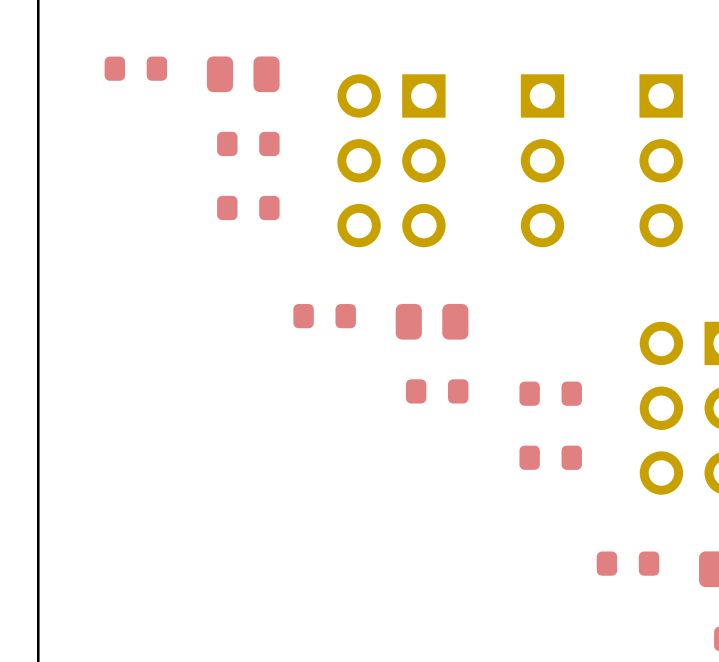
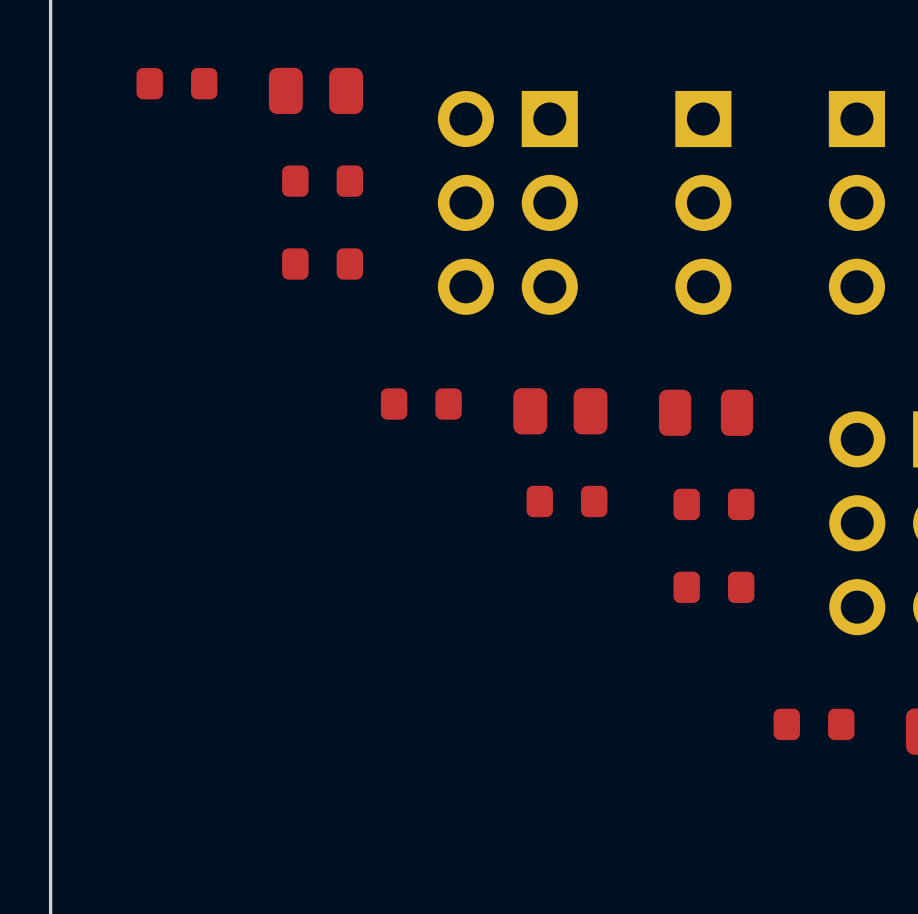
part: none -> (706, 412)

